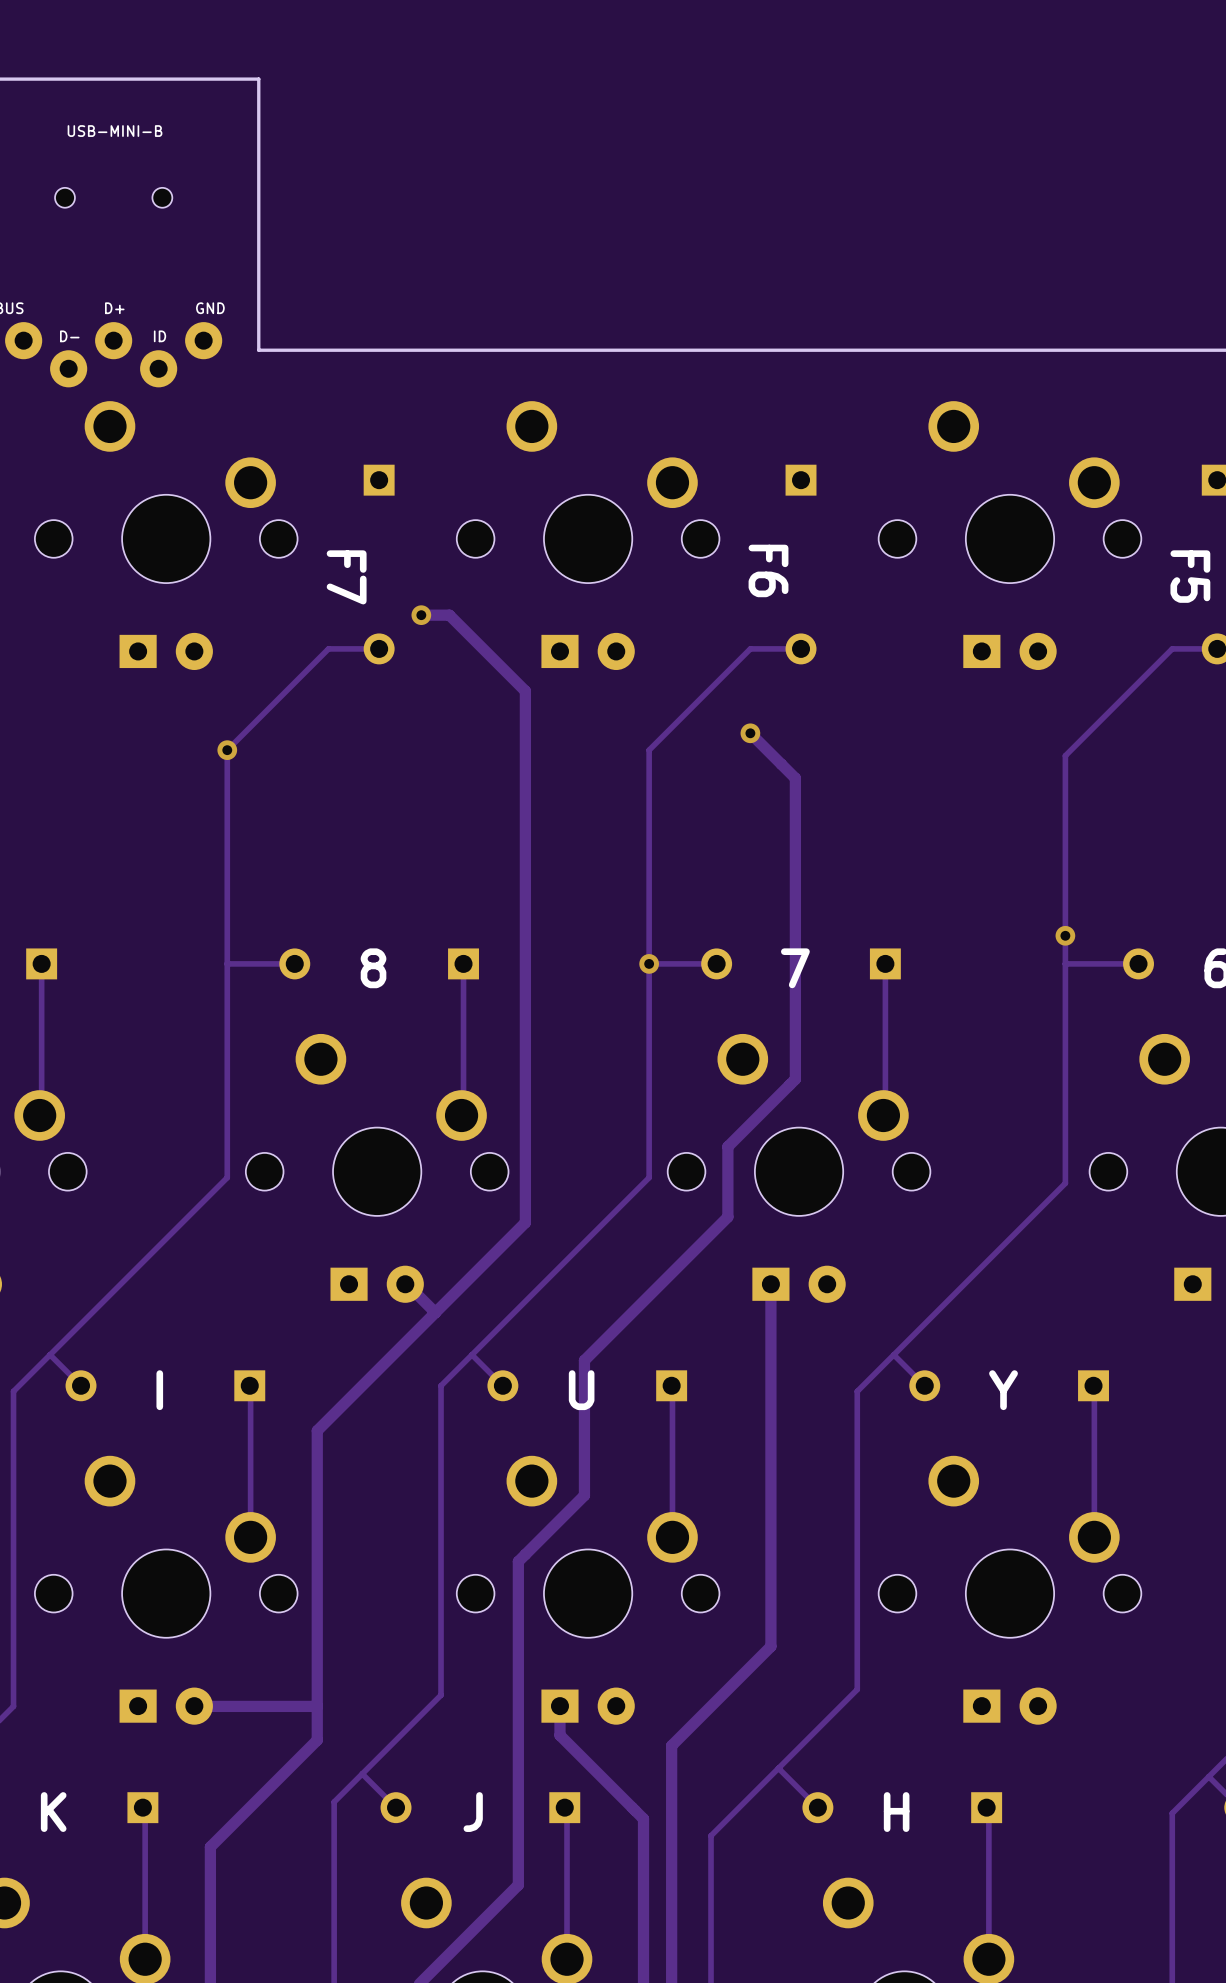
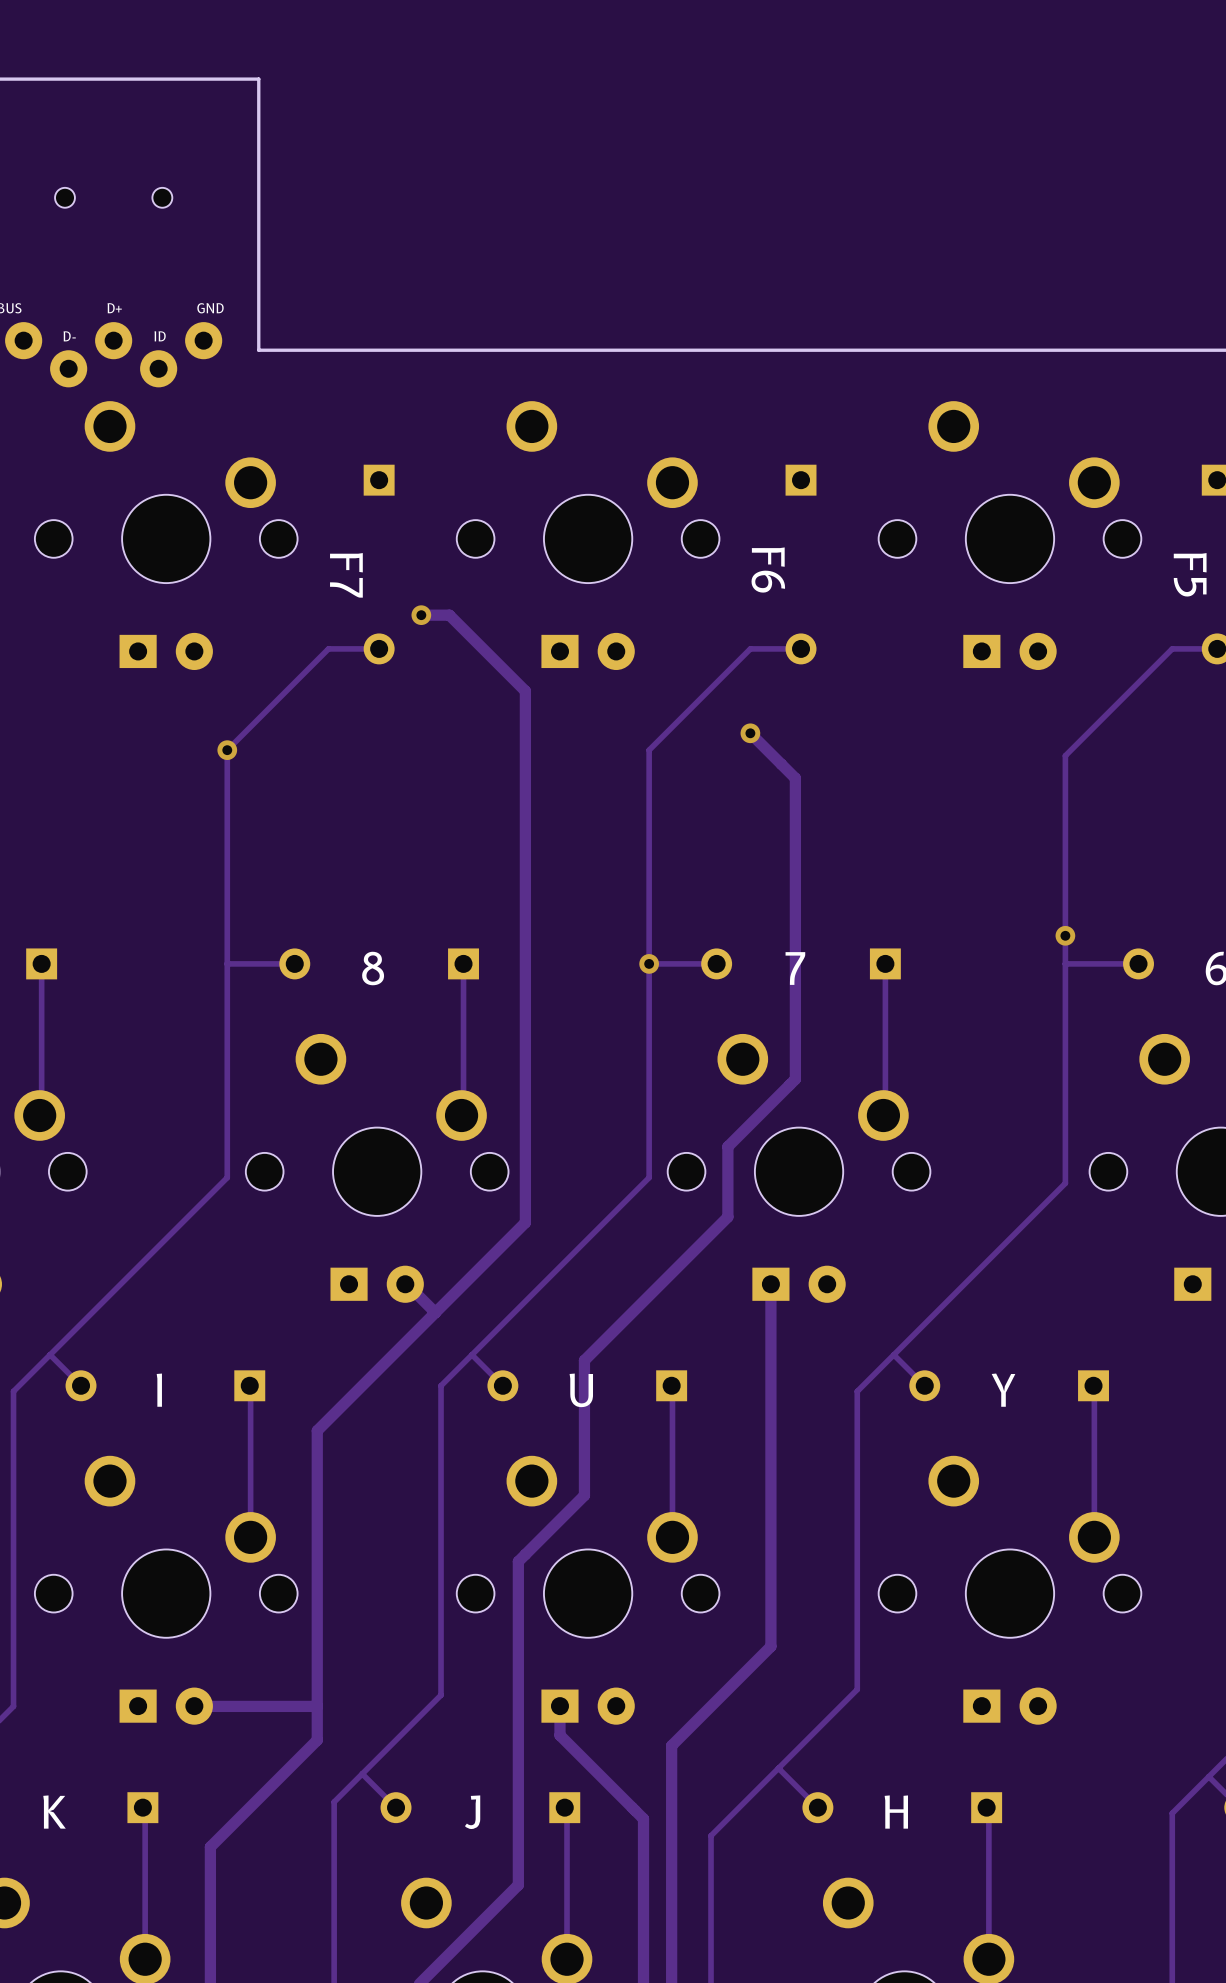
text: USB-MINI-B (115, 131) -> none

